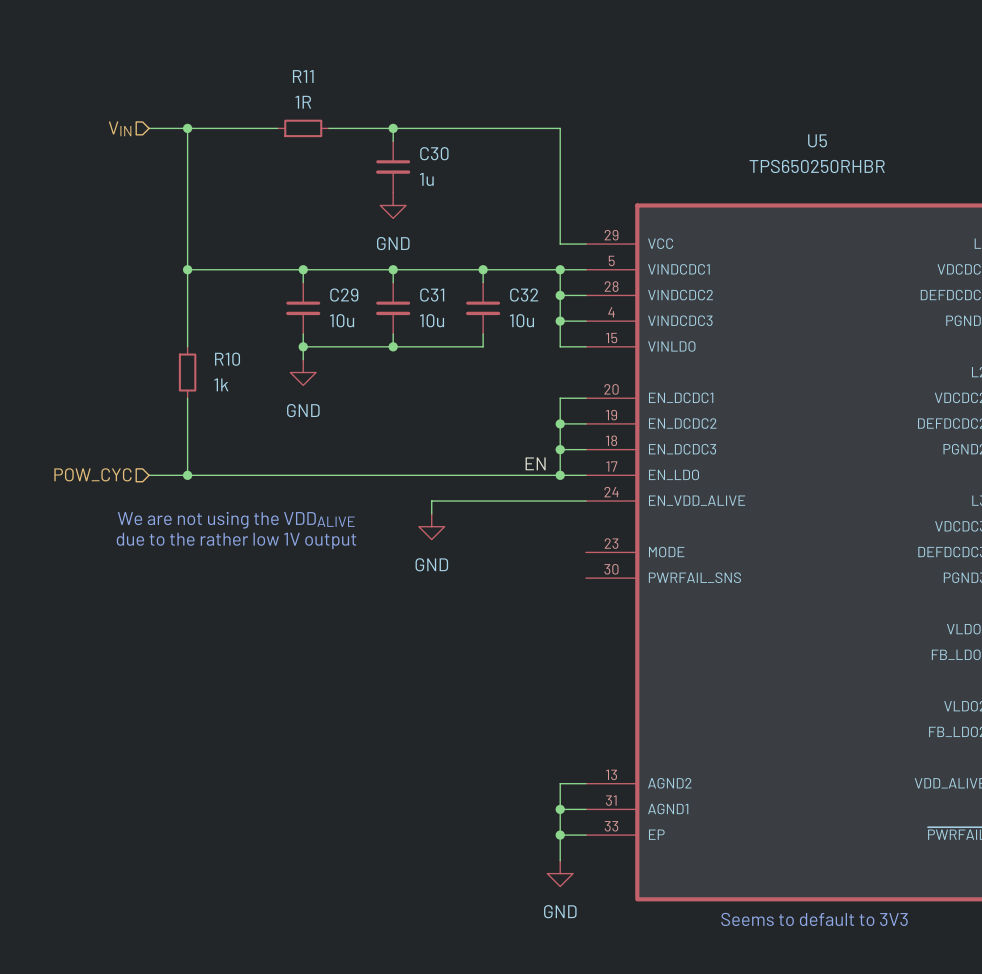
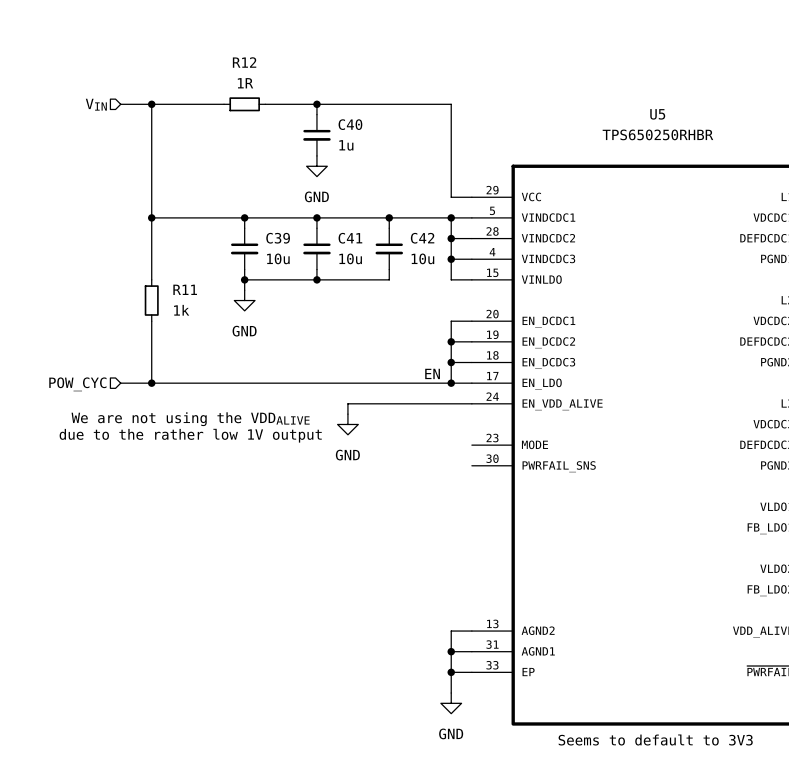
R11 name: R11 (303, 76) -> R12 (244, 62)
C30 name: C30 (434, 153) -> C40 (350, 124)
C29 name: C29 (344, 295) -> C39 (278, 238)
C31 name: C31 (432, 295) -> C41 (350, 238)
C32 name: C32 (524, 295) -> C42 (422, 238)
R10 name: R10 (227, 359) -> R11 (185, 289)

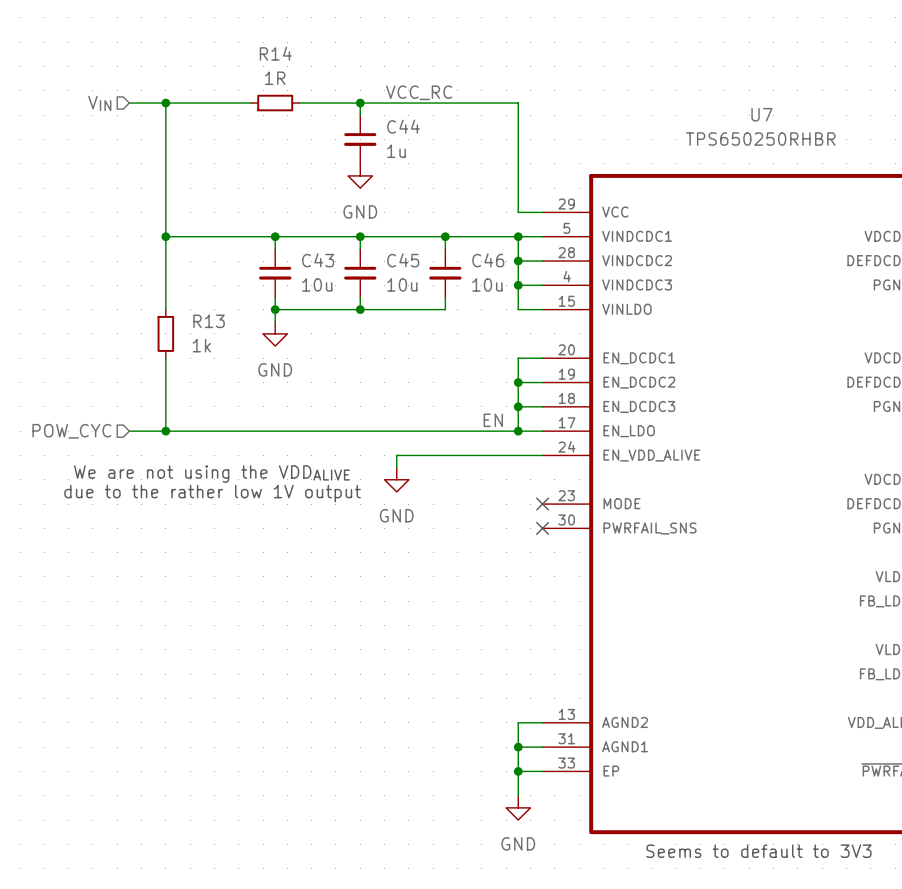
R12 name: R12 (244, 62) -> R14 (275, 53)
label: none -> VCC_RC (419, 92)
U5 name: U5 (657, 114) -> U7 (761, 114)
C40 name: C40 (350, 124) -> C44 (403, 126)
C39 name: C39 (278, 238) -> C43 (318, 260)
C41 name: C41 (350, 238) -> C45 (403, 260)
C42 name: C42 (422, 238) -> C46 (488, 260)
R11 name: R11 (185, 289) -> R13 (209, 321)
no-connect mark: none -> (542, 504)
no-connect mark: none -> (542, 528)

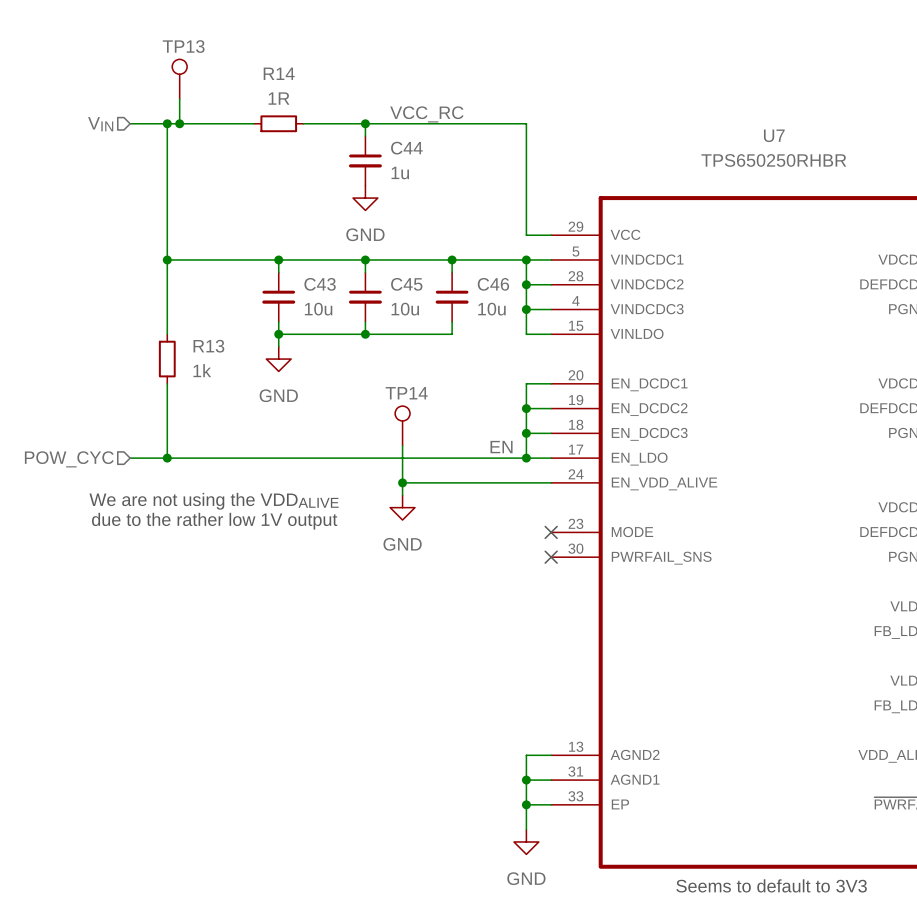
TP13: none -> (179, 79)
wire: none -> (179, 99) (179, 123)
junction: none -> (179, 123)
TP14: none -> (402, 425)
wire: none -> (402, 445) (402, 482)
junction: none -> (402, 482)

